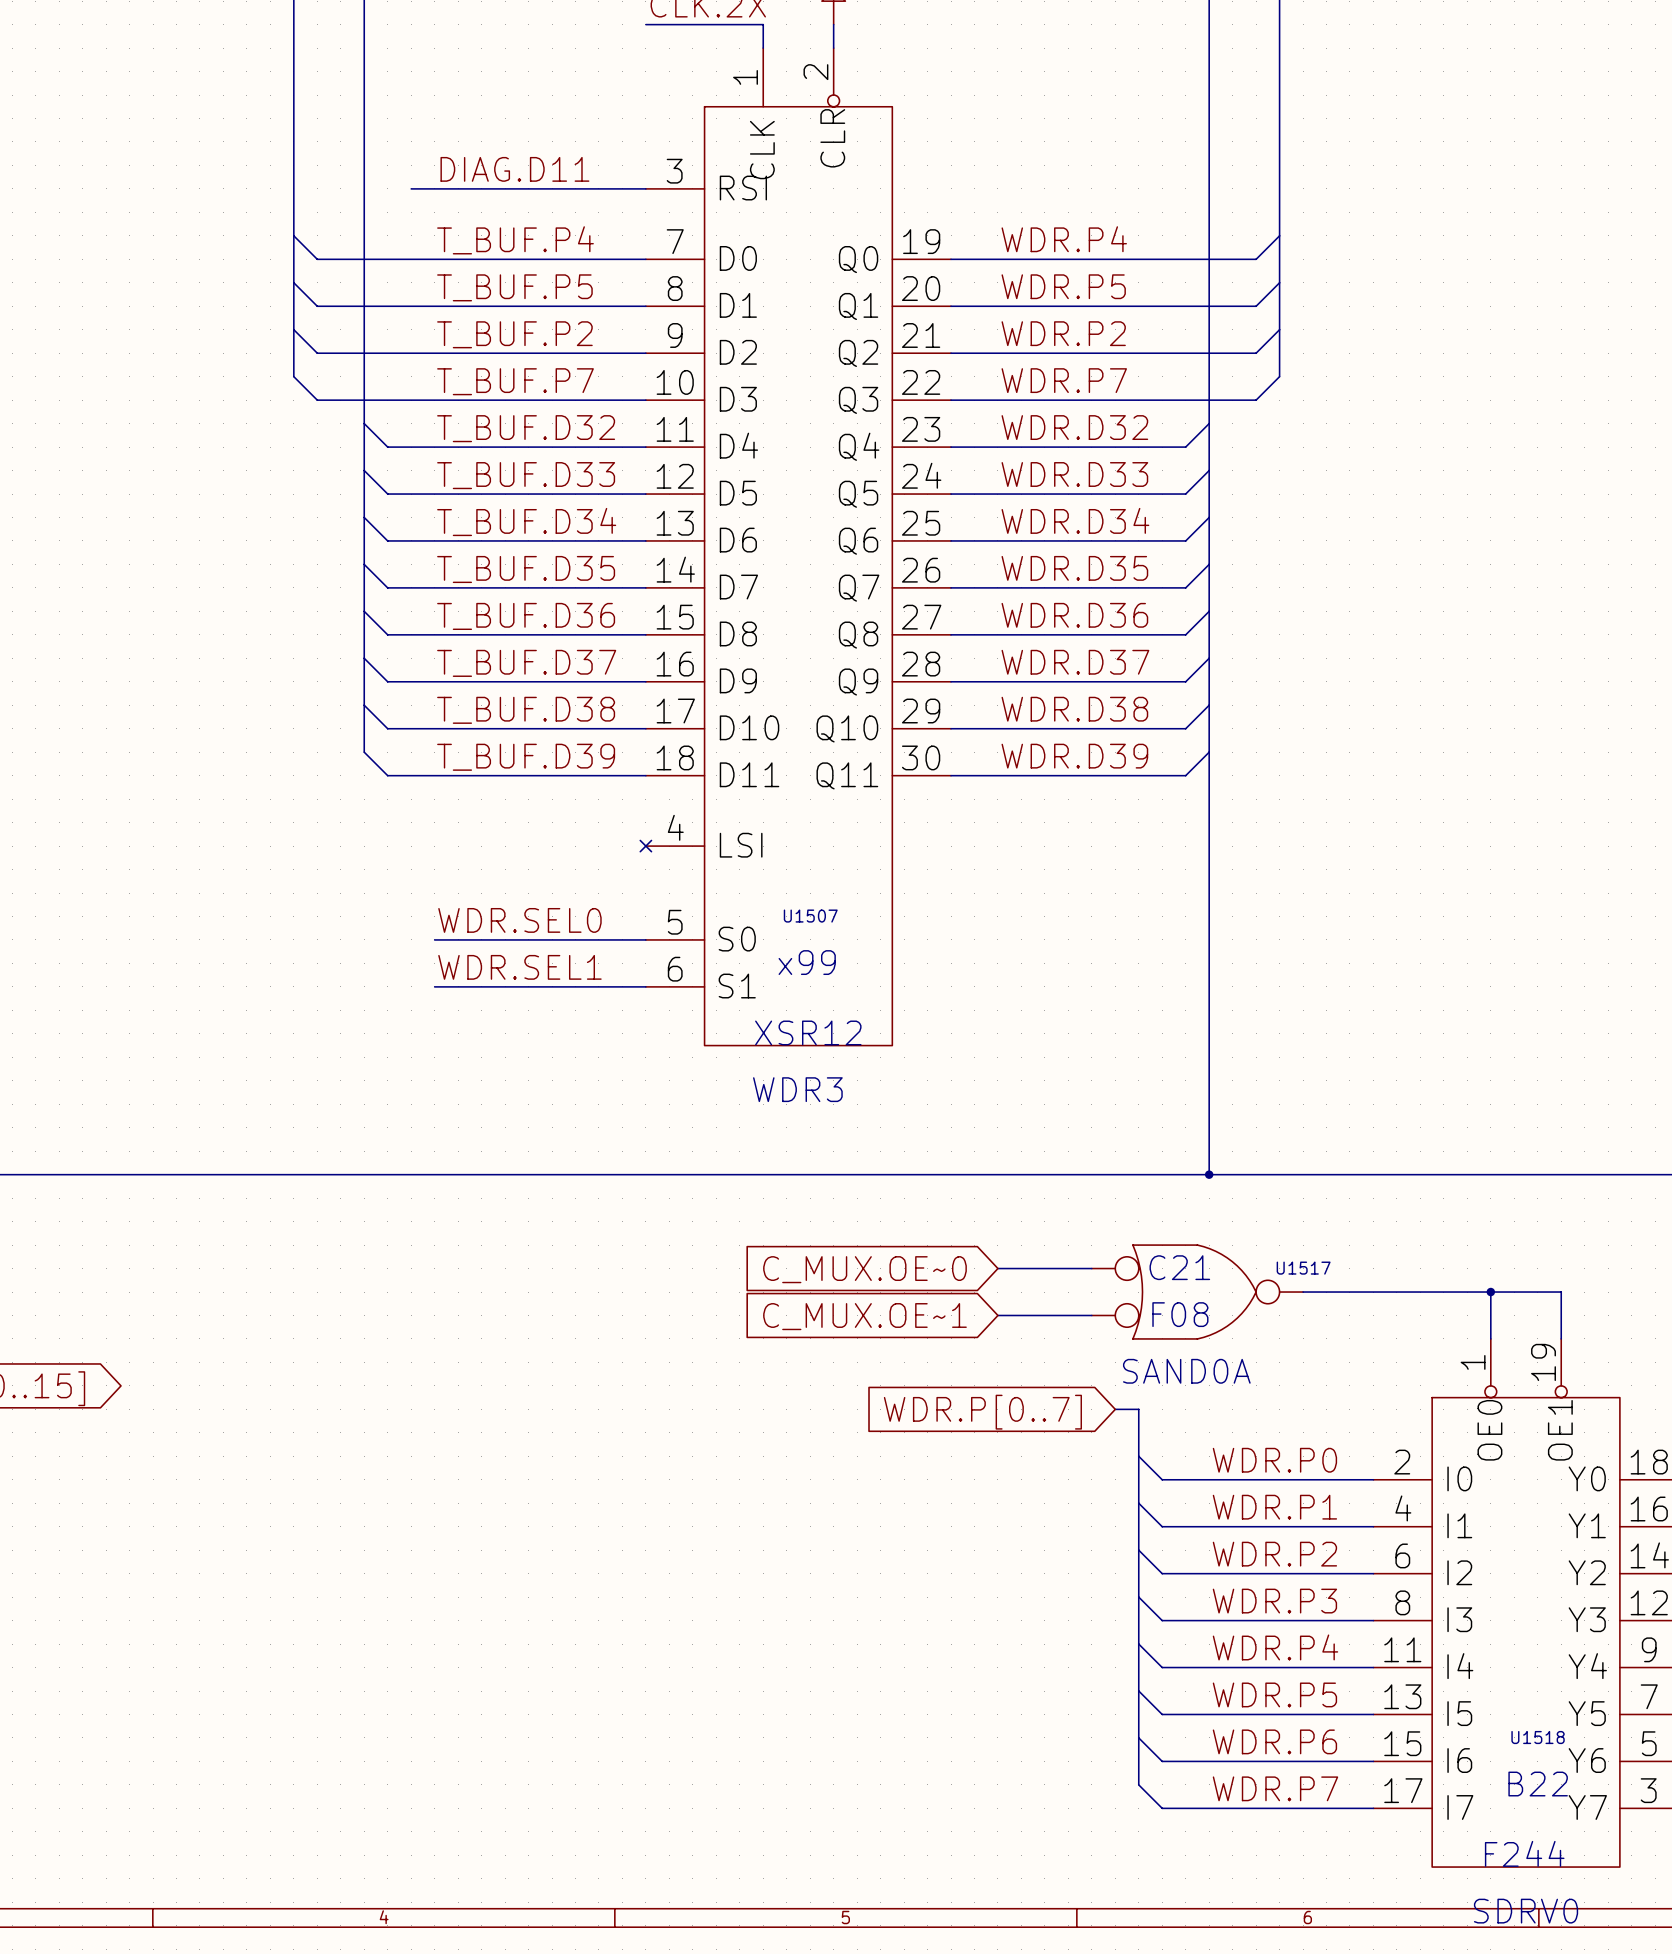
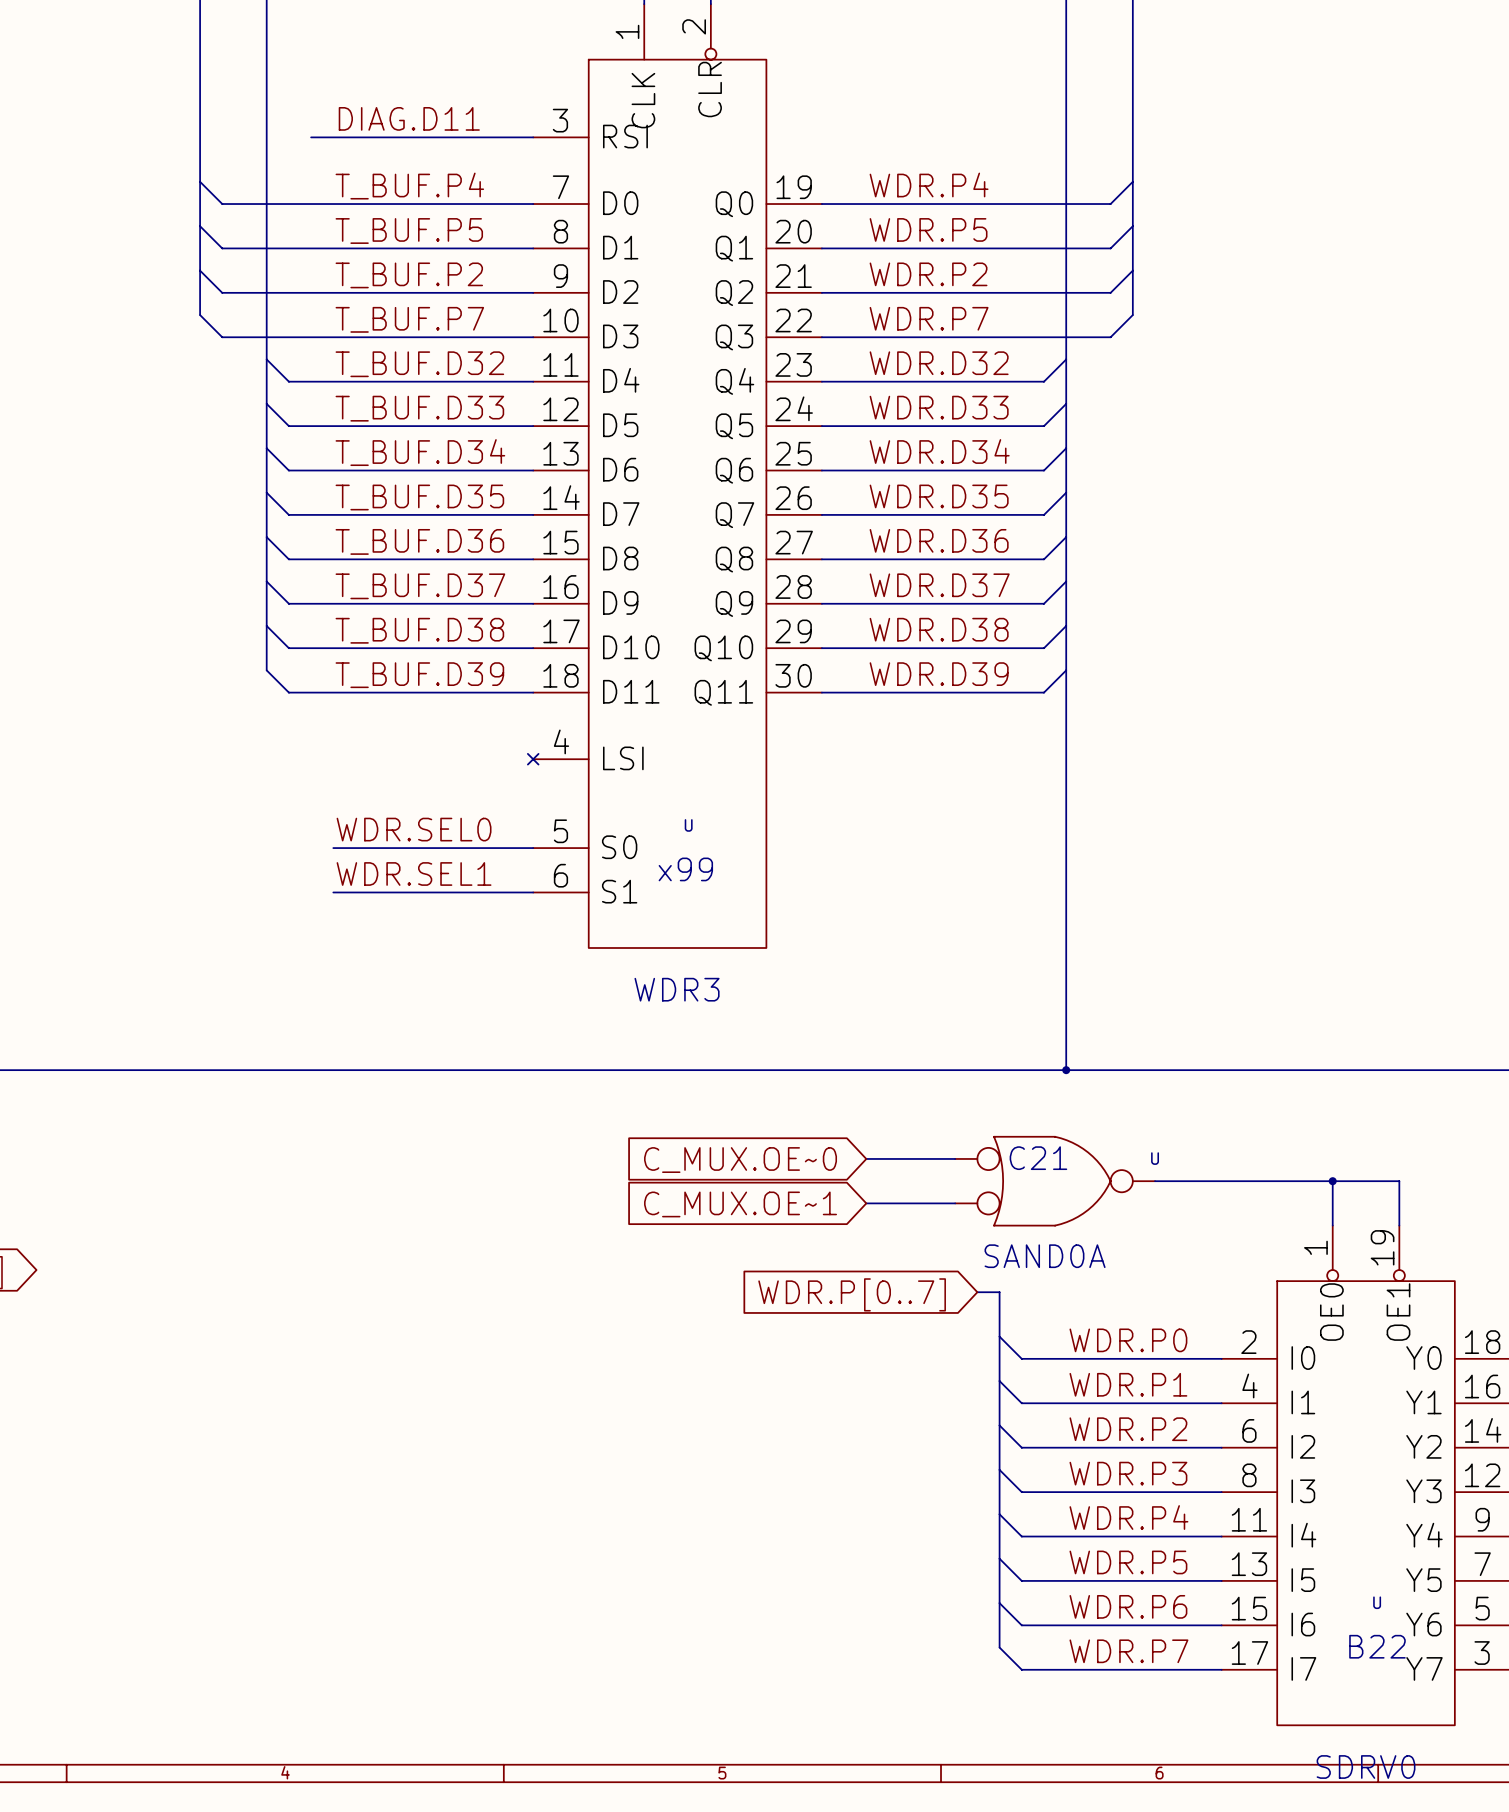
U1507 name: U1507 (810, 916) -> U (688, 825)
U1507 value: XSR12 (808, 1032) -> none
U1517 name: U1517 (1303, 1268) -> U (1155, 1158)
U1517 value: F08 (1180, 1314) -> none
U1518 name: U1518 (1538, 1737) -> U (1377, 1602)
U1518 value: F244 (1524, 1853) -> none

